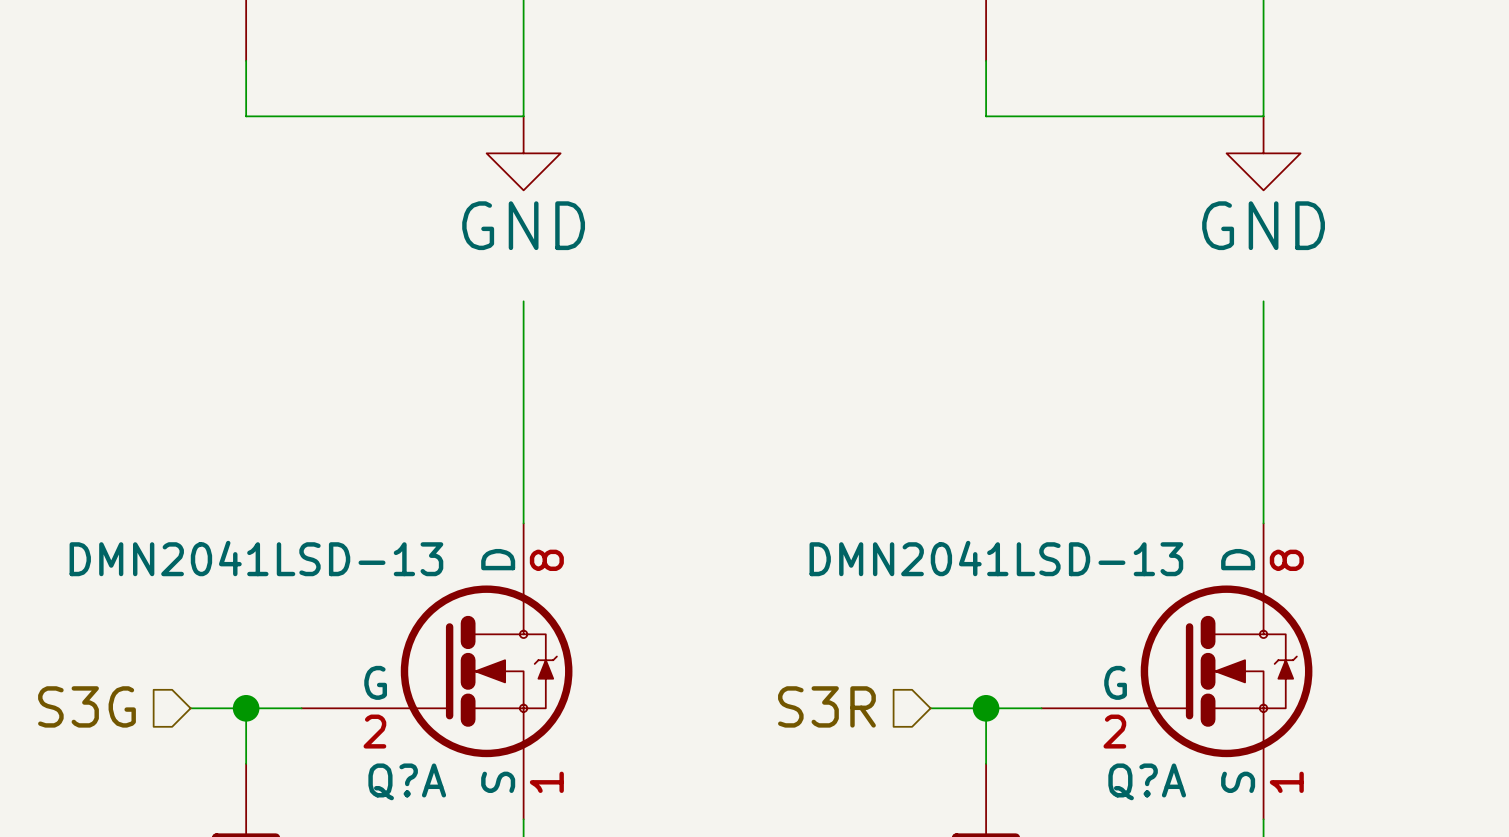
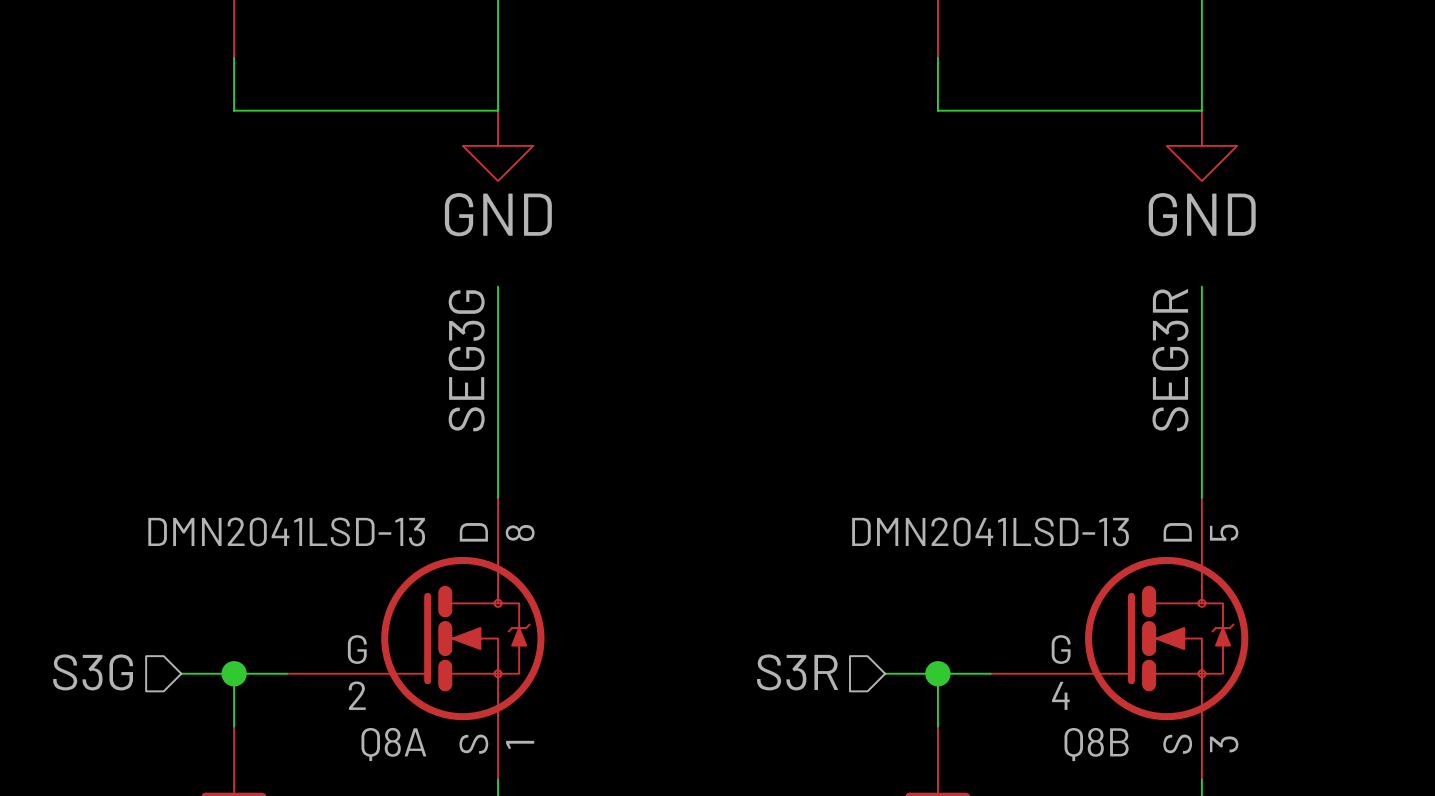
label: none -> SEG3G (466, 360)
label: none -> SEG3R (1170, 360)
Q?A pin number: 8 (1286, 560) -> 5 (1224, 532)
Q?A pin number: 2 (1114, 731) -> 4 (1060, 695)
Q?A name: Q?A (407, 781) -> Q8A (393, 744)
Q?A name: Q?A (1147, 781) -> Q8B (1096, 744)
Q?A pin number: 1 (1286, 782) -> 3 (1224, 744)

